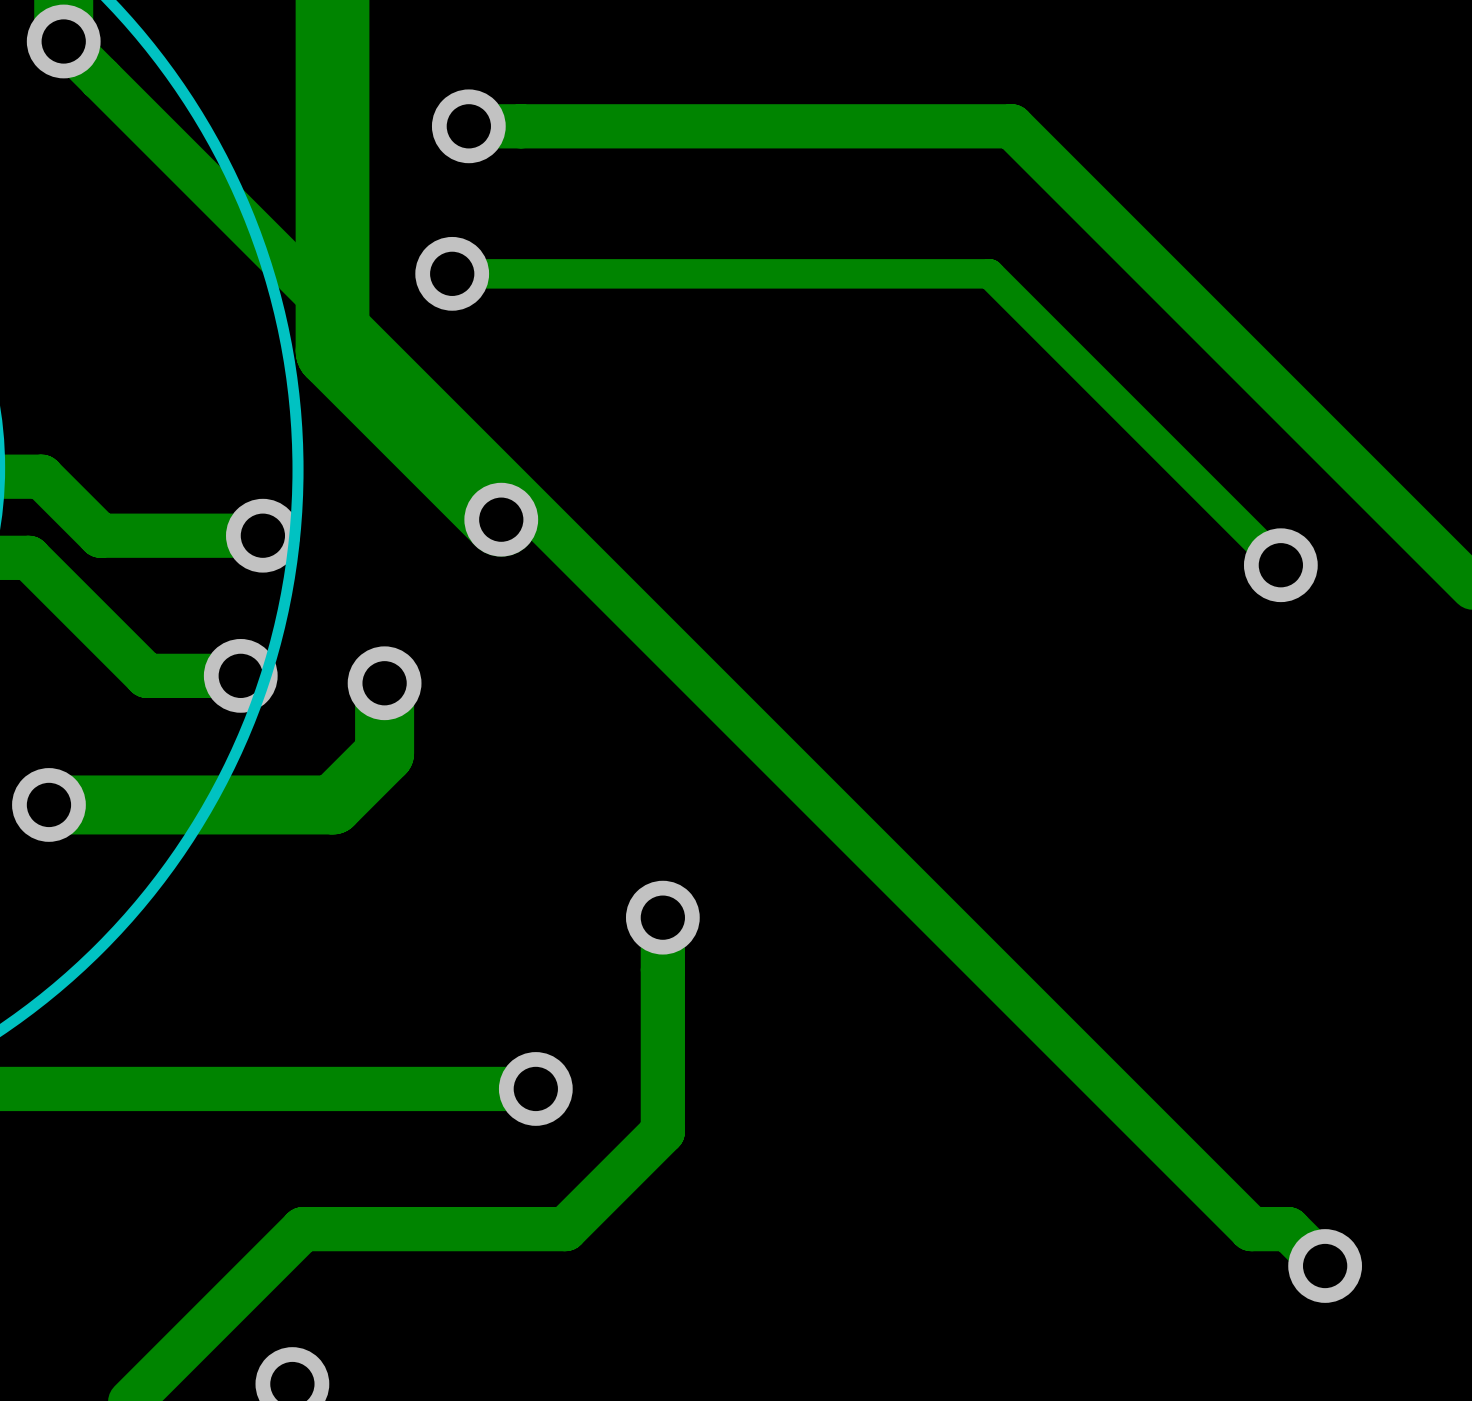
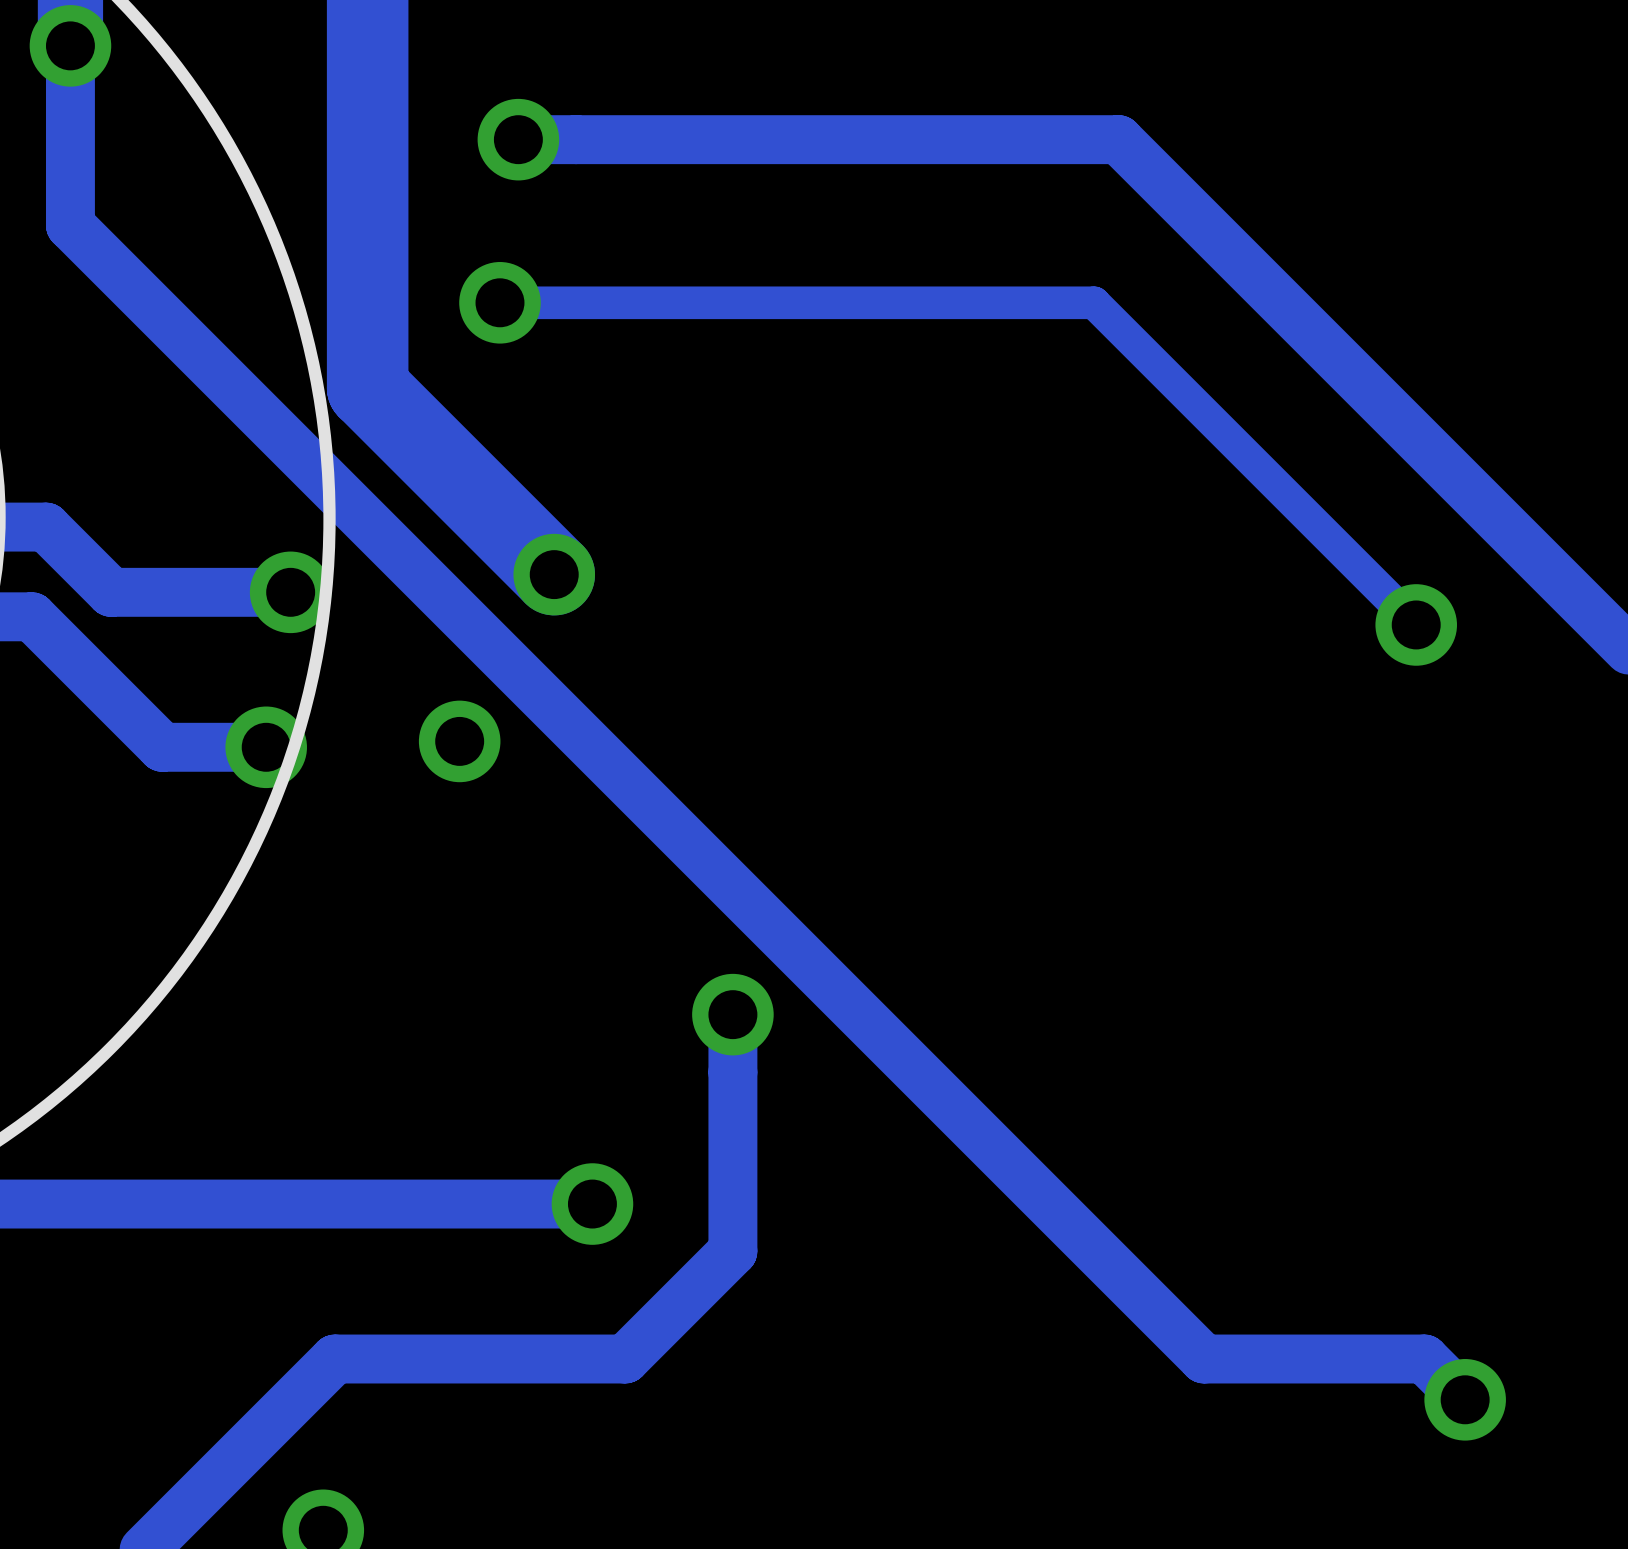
track: (63, 41) (1251, 1229) -> (70, 45) (70, 225) (1204, 1359) (1383, 1359)
track: (384, 683) (384, 753) (332, 804) (48, 804) -> none
via position: (384, 683) -> (459, 741)
via: (48, 804) -> none

